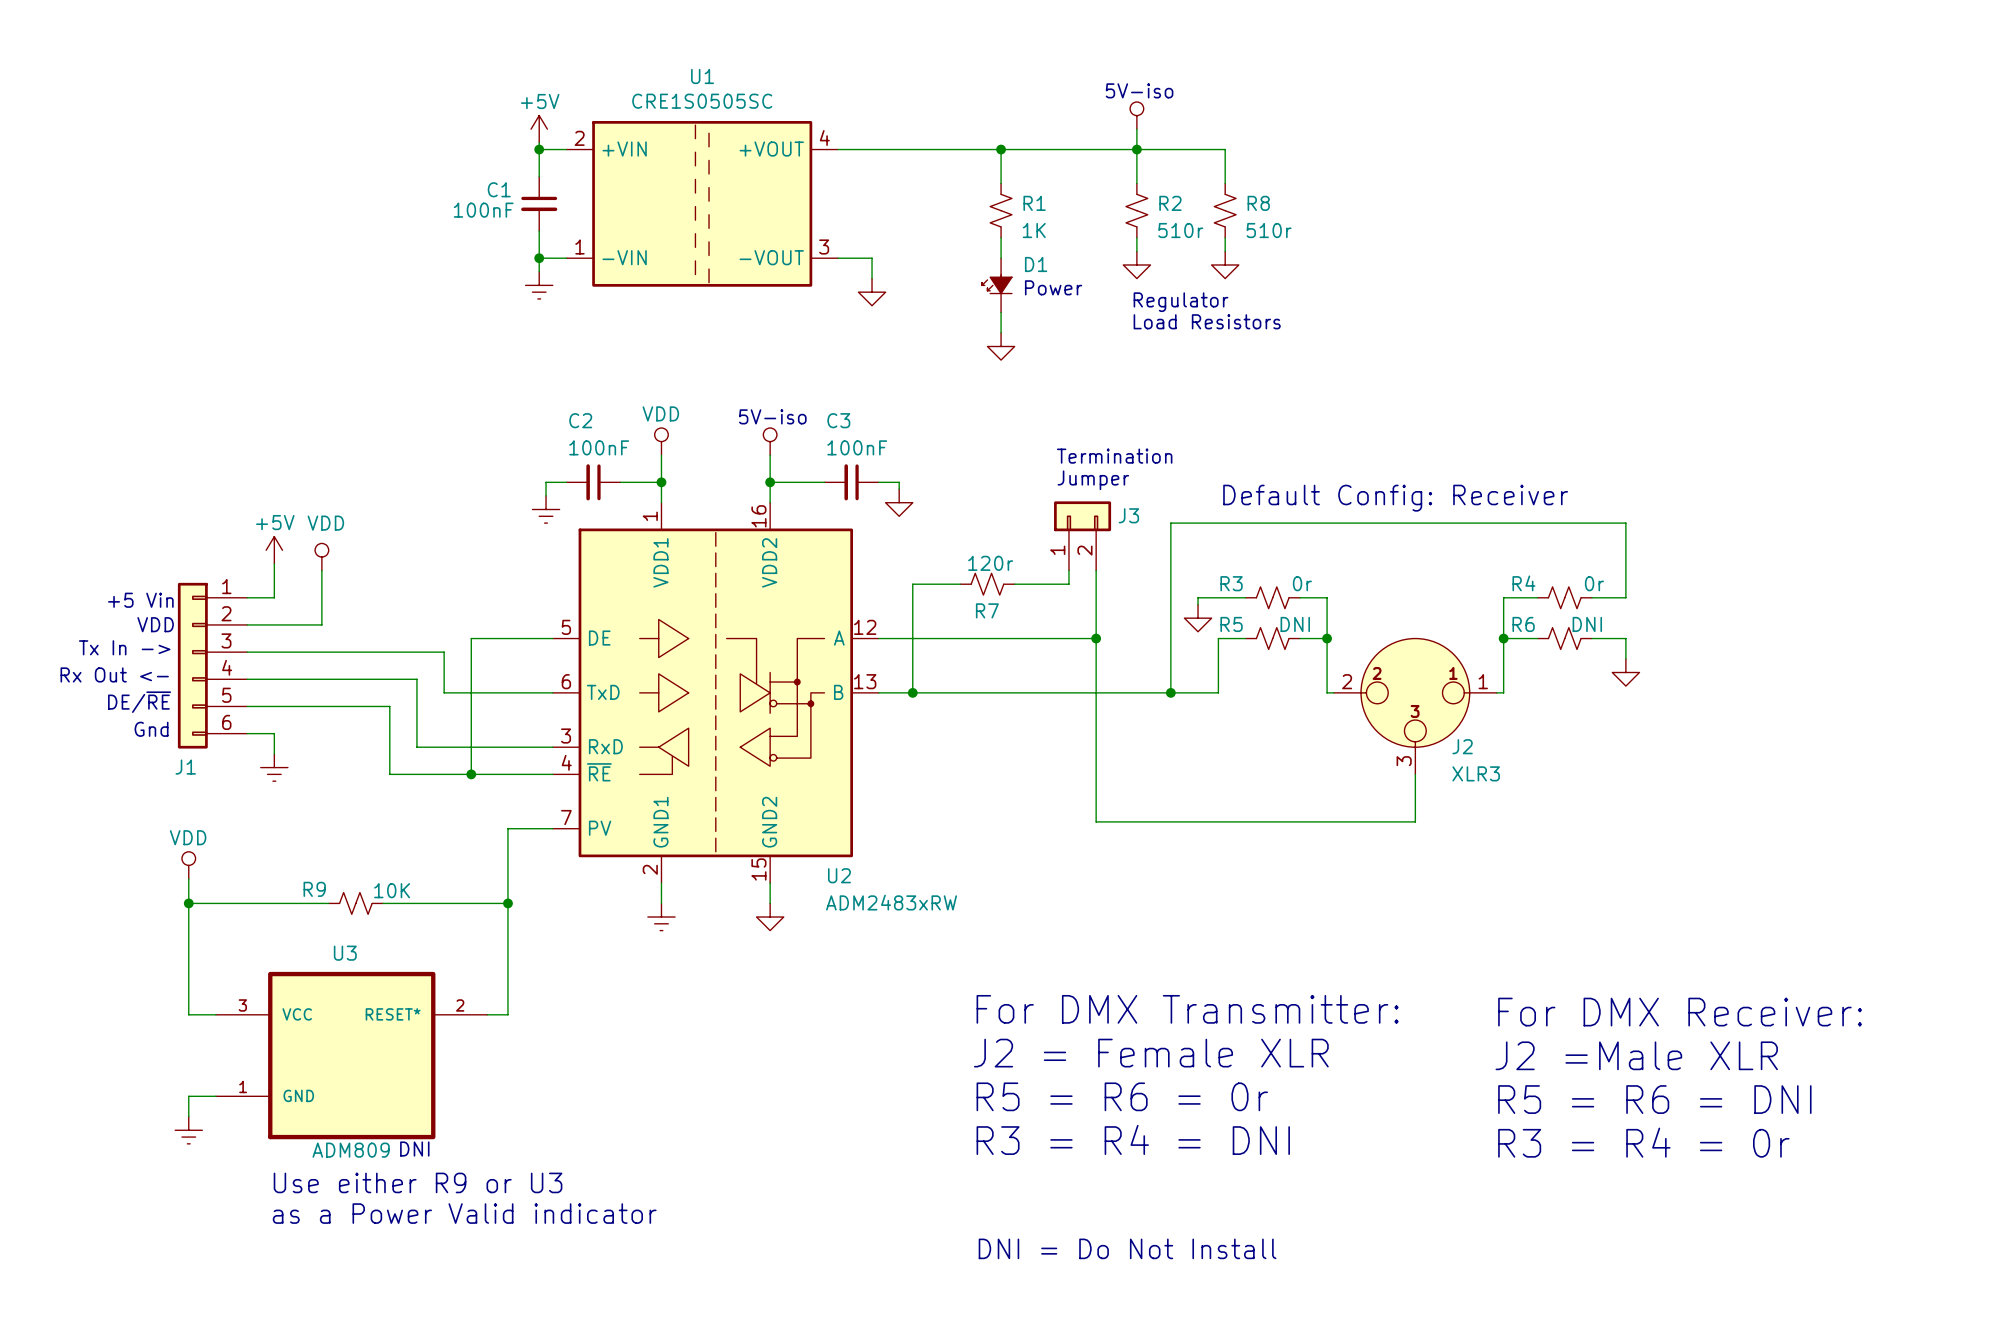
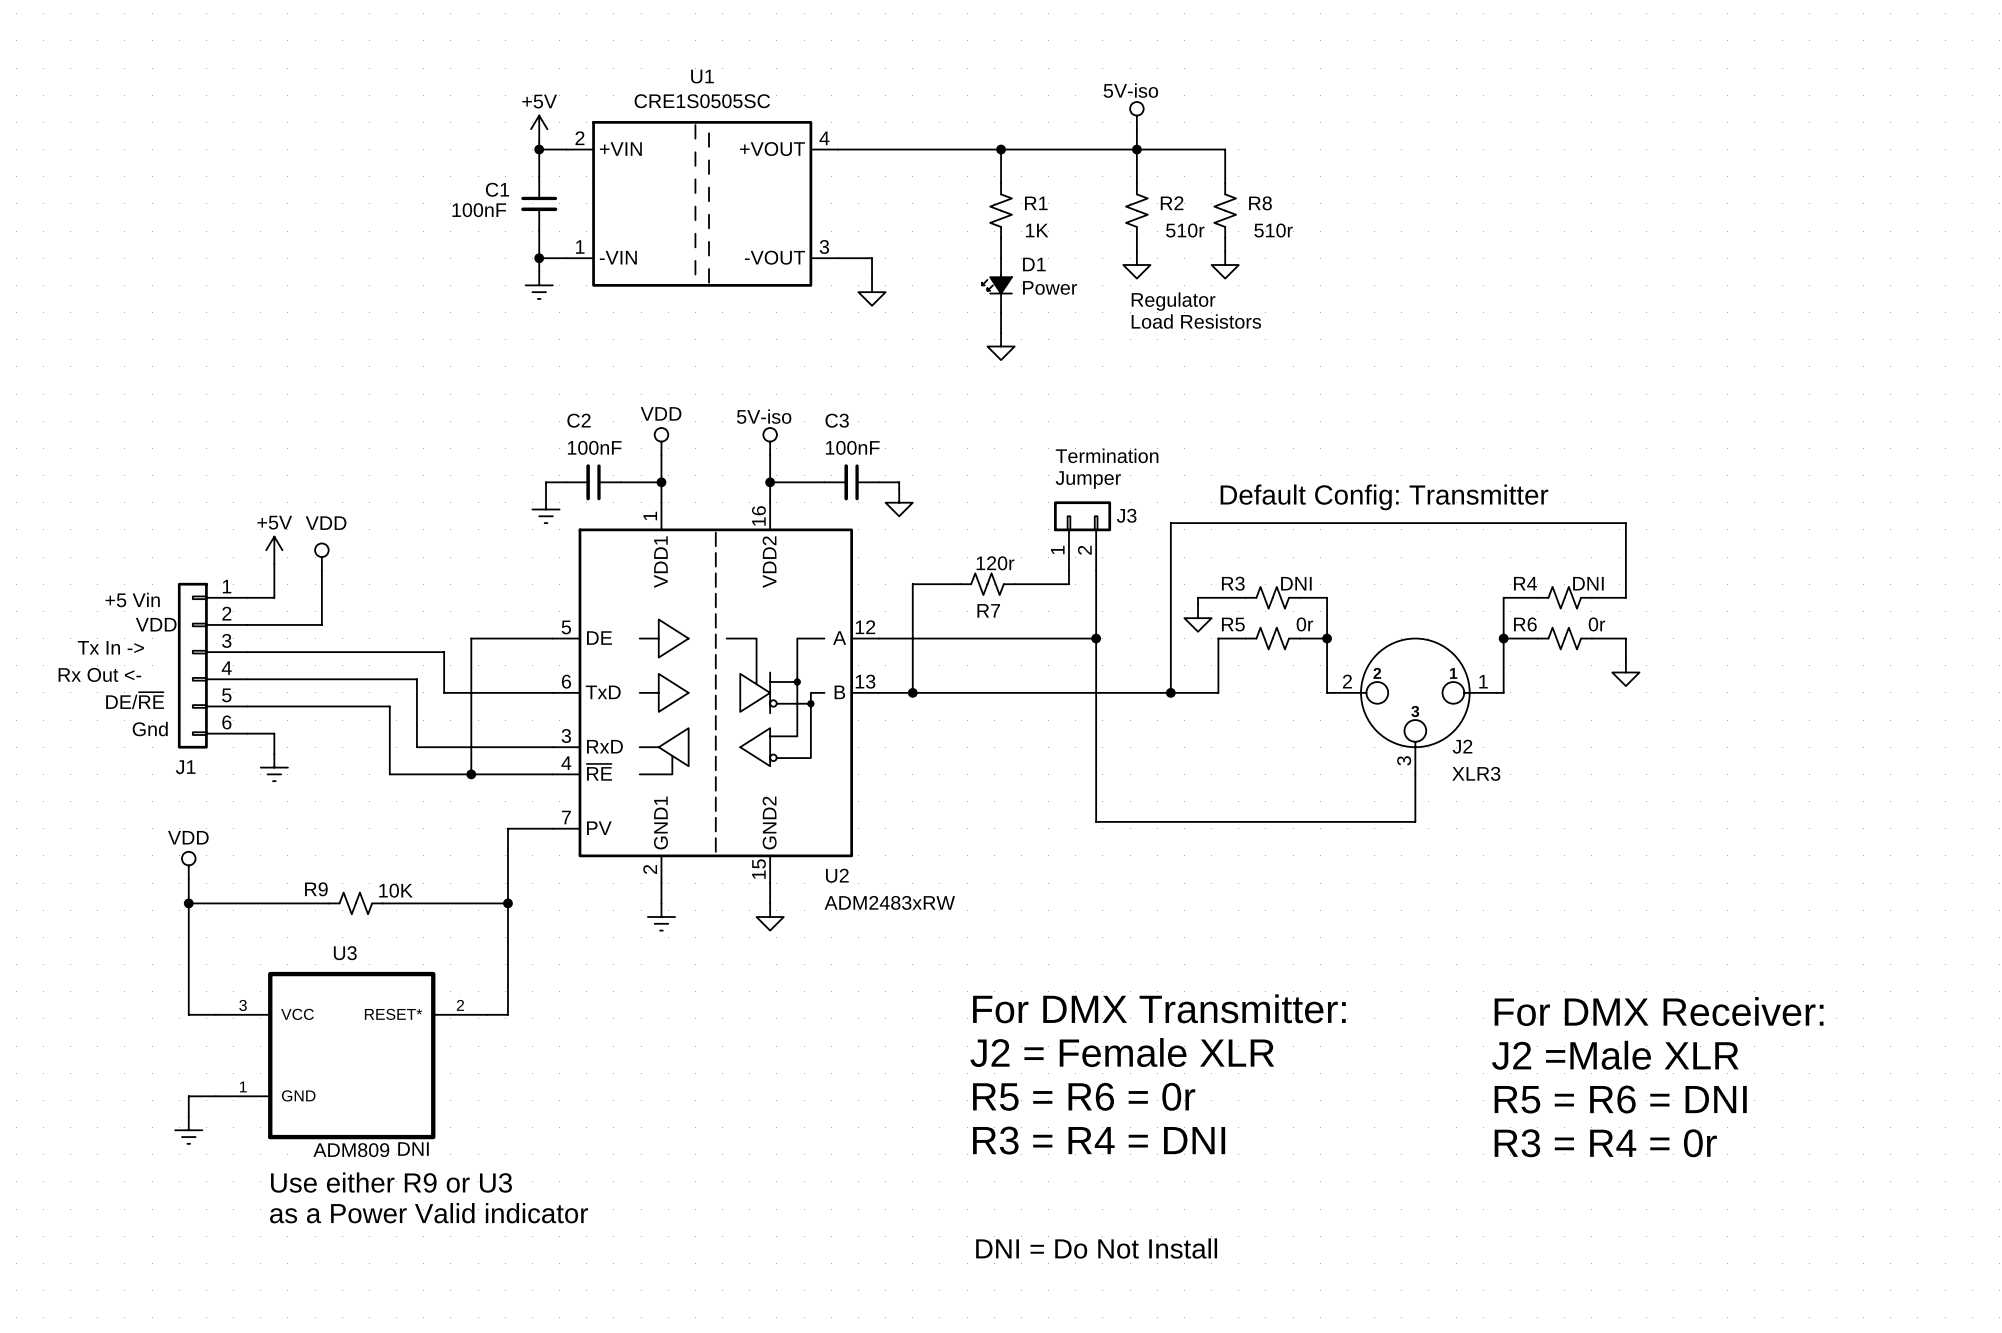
text: Default Config: Receiver (1395, 498) -> Default Config: Transmitter (1384, 497)
R3 value: 0r (1302, 583) -> DNI (1296, 583)
R4 value: 0r (1594, 583) -> DNI (1588, 583)
R5 value: DNI (1295, 624) -> 0r (1304, 624)
R6 value: DNI (1587, 624) -> 0r (1596, 624)

